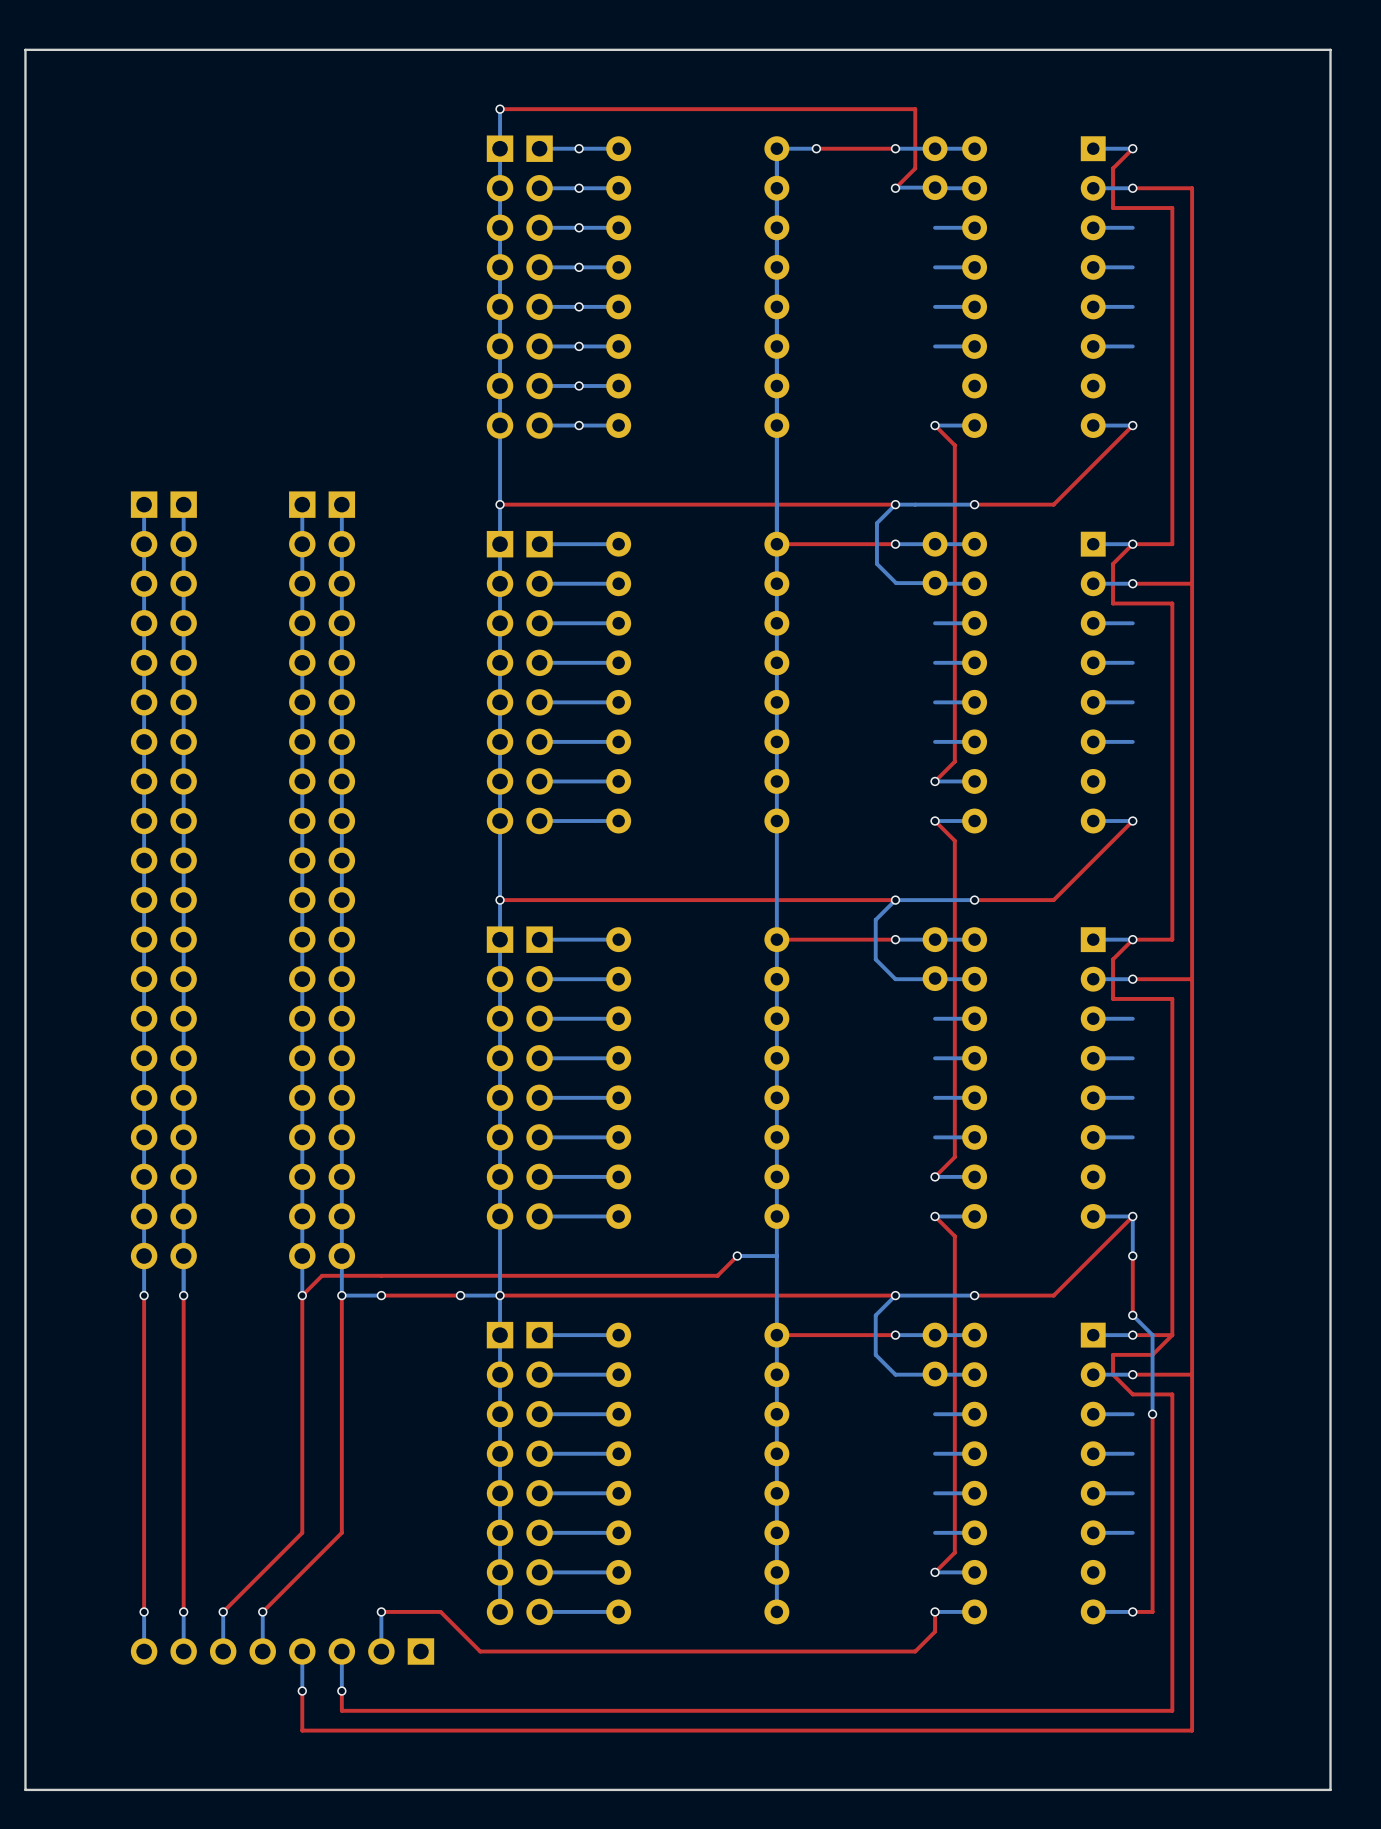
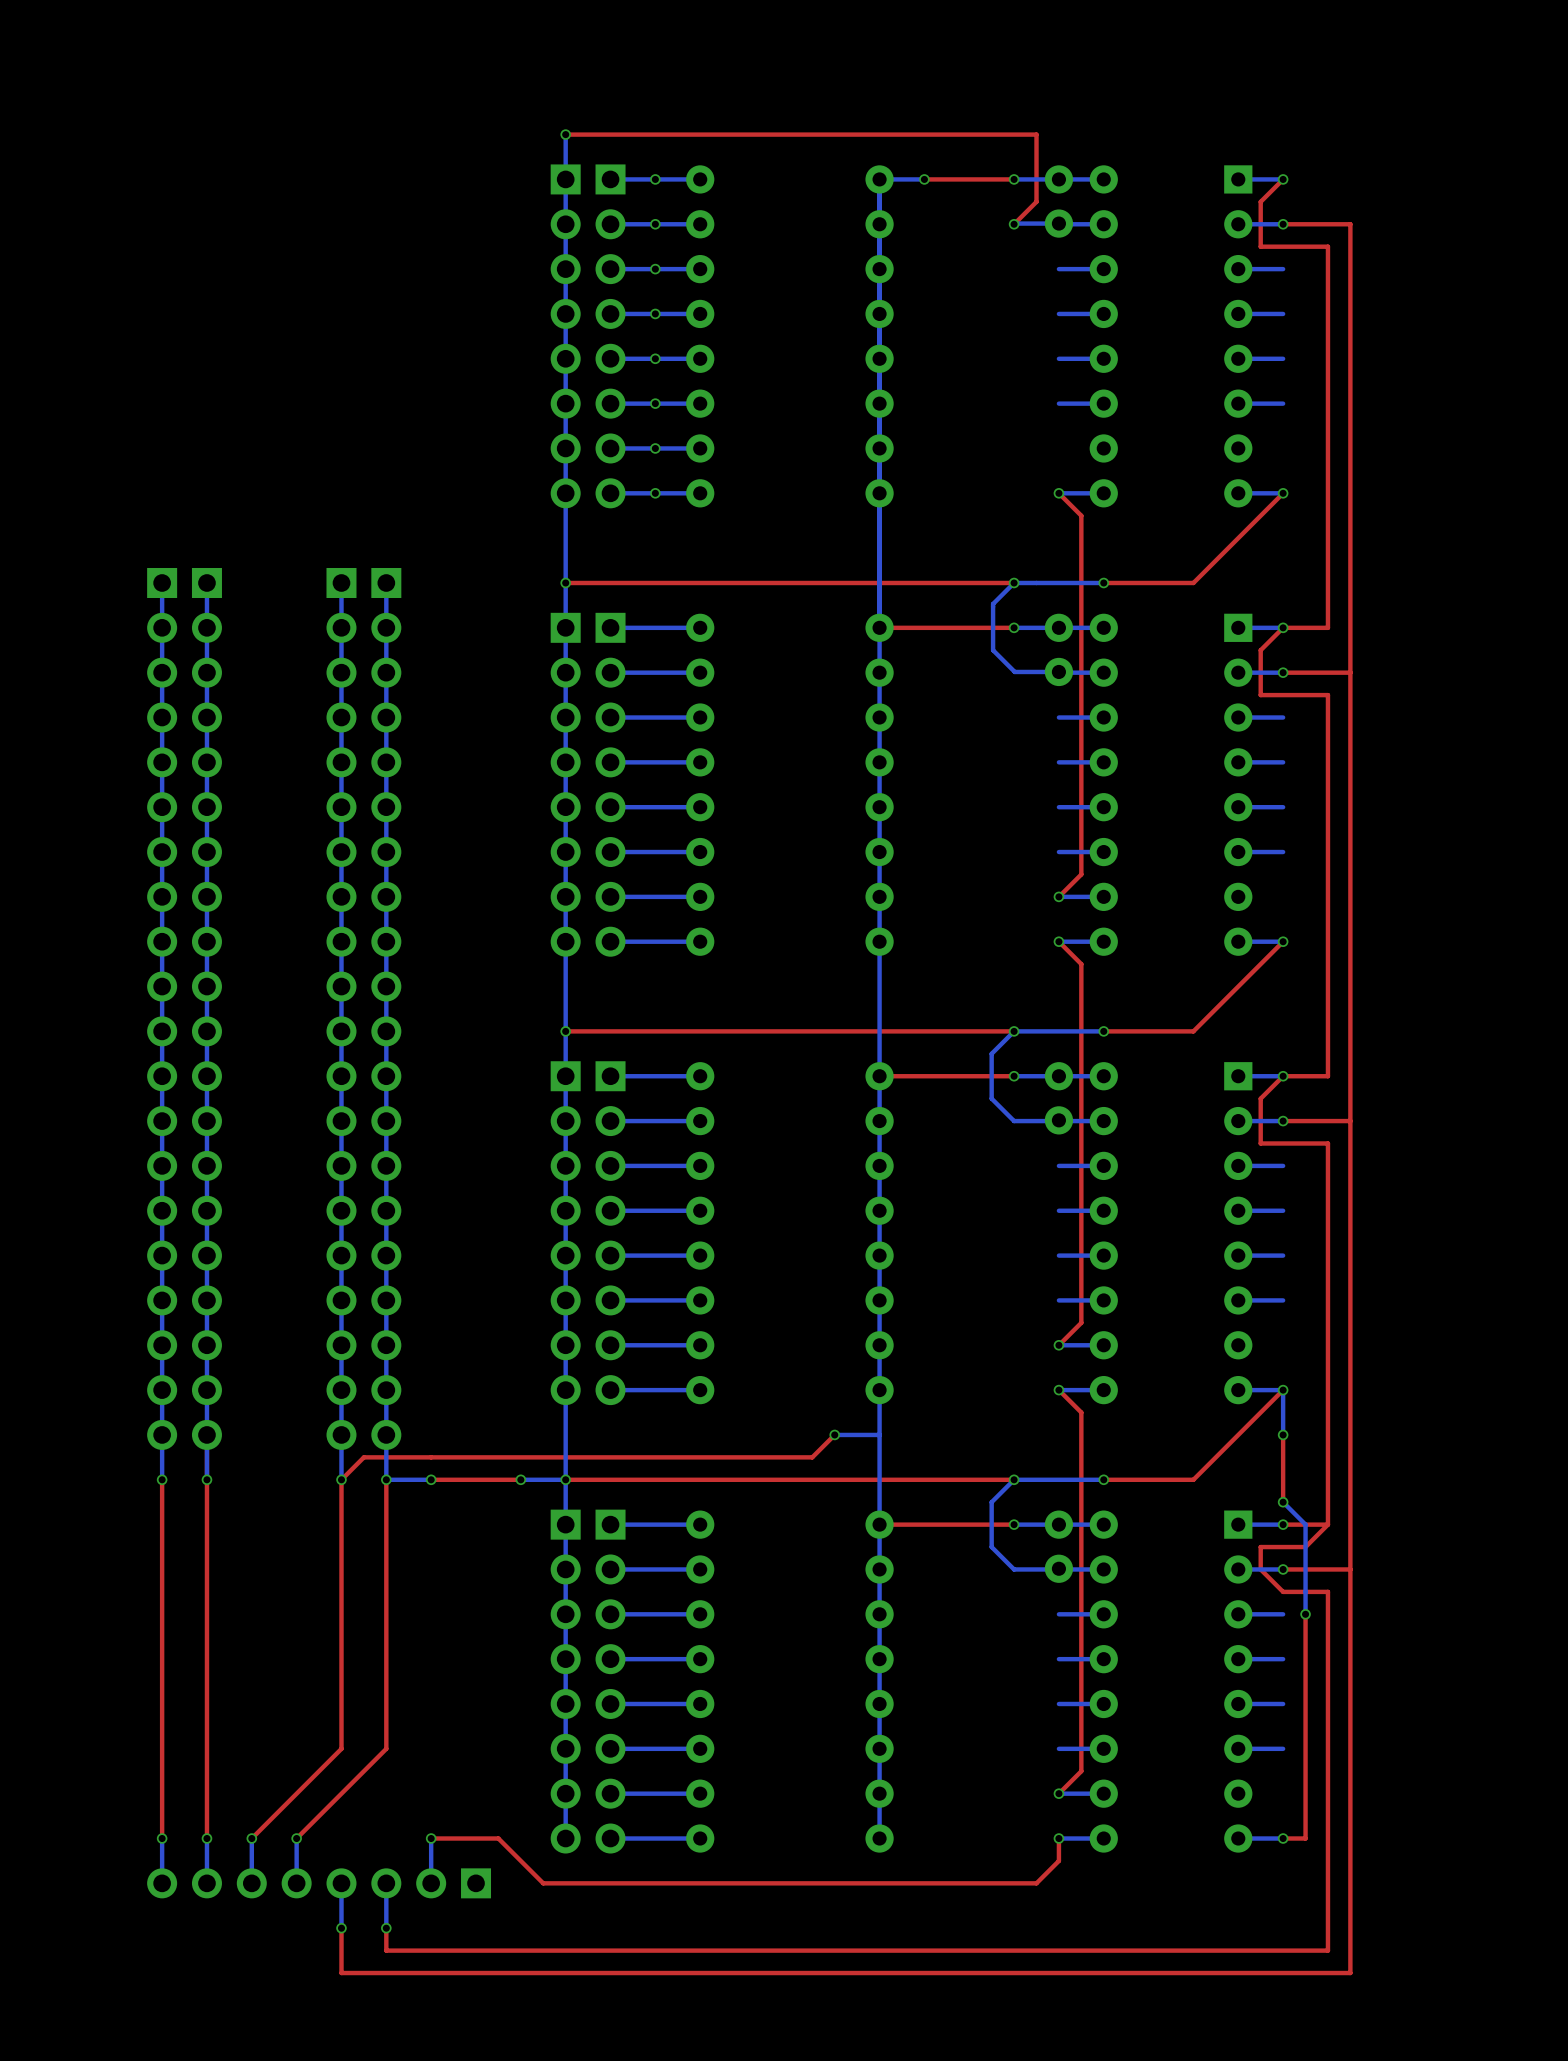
board edge: (1330, 49) (1330, 1789) (25, 1789) (25, 49) (1330, 49) -> none

